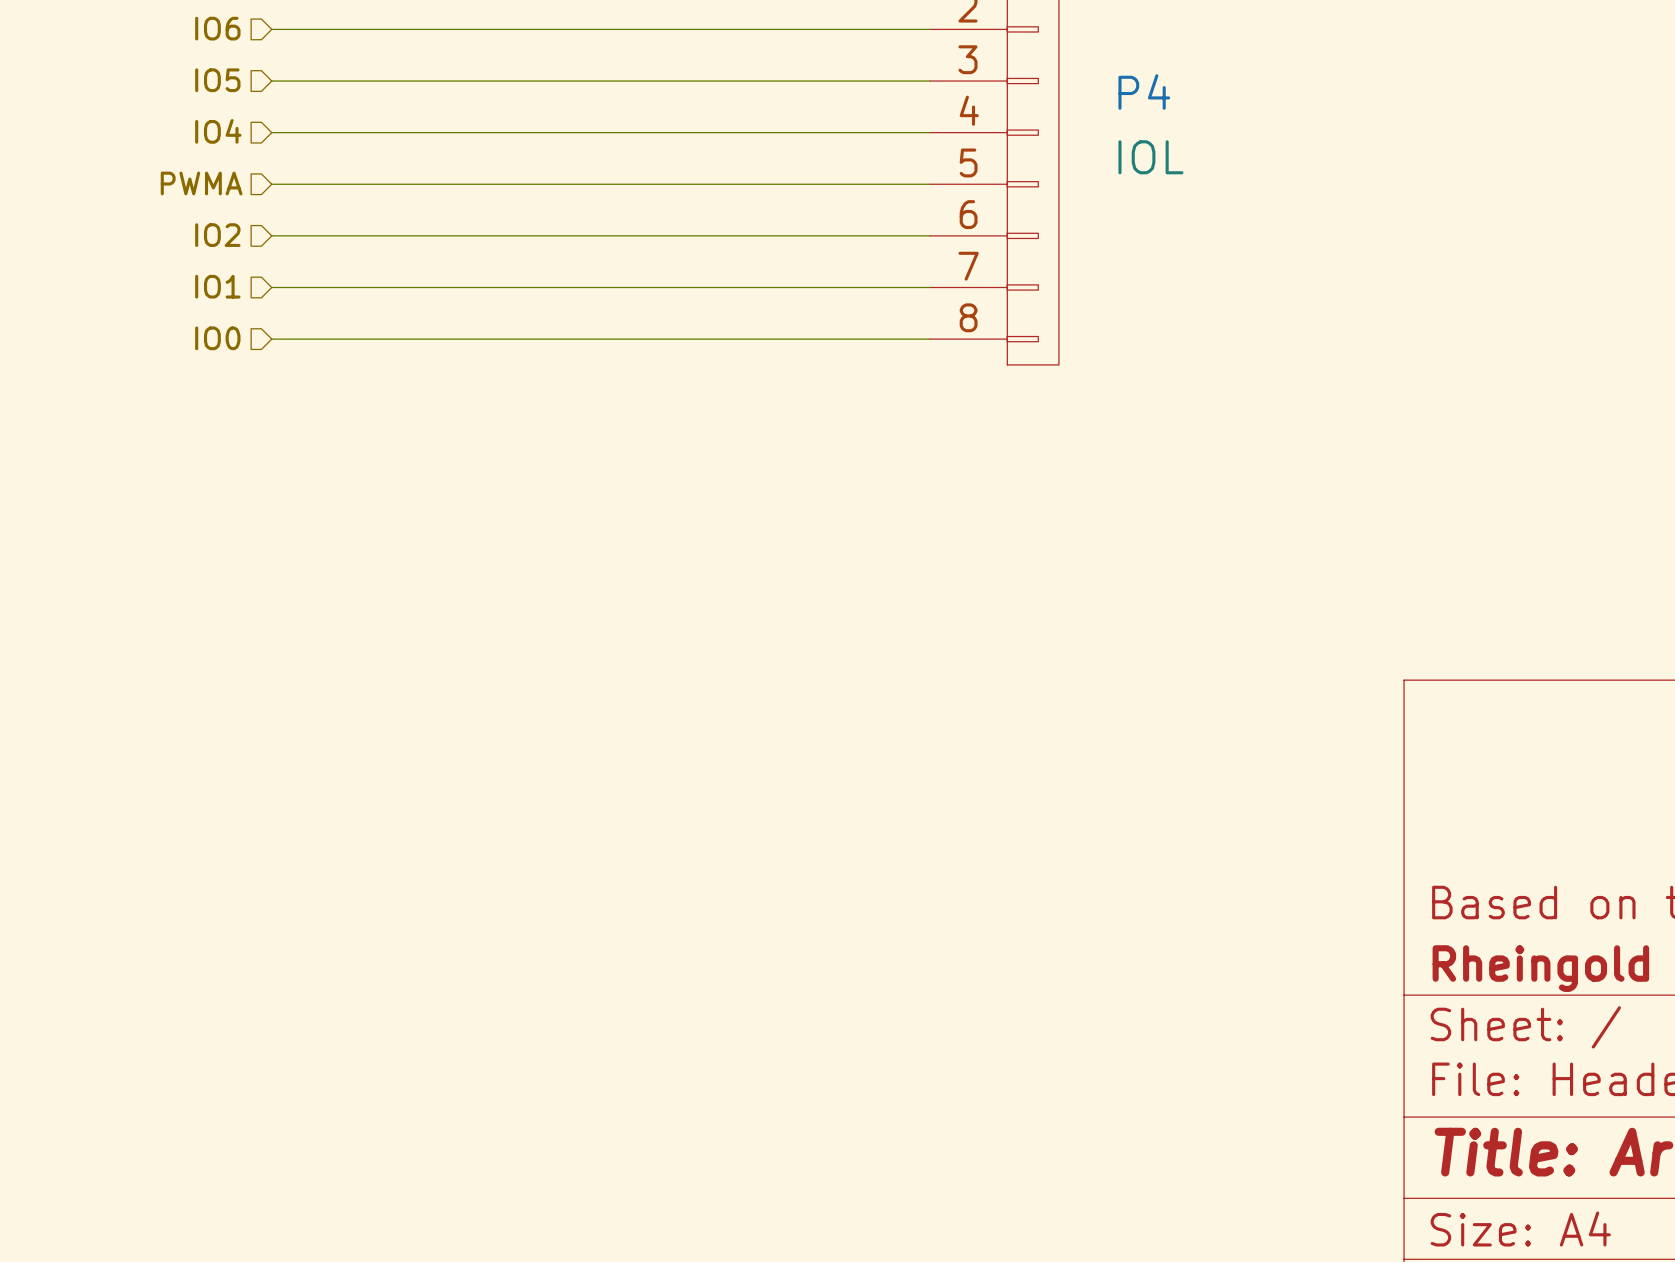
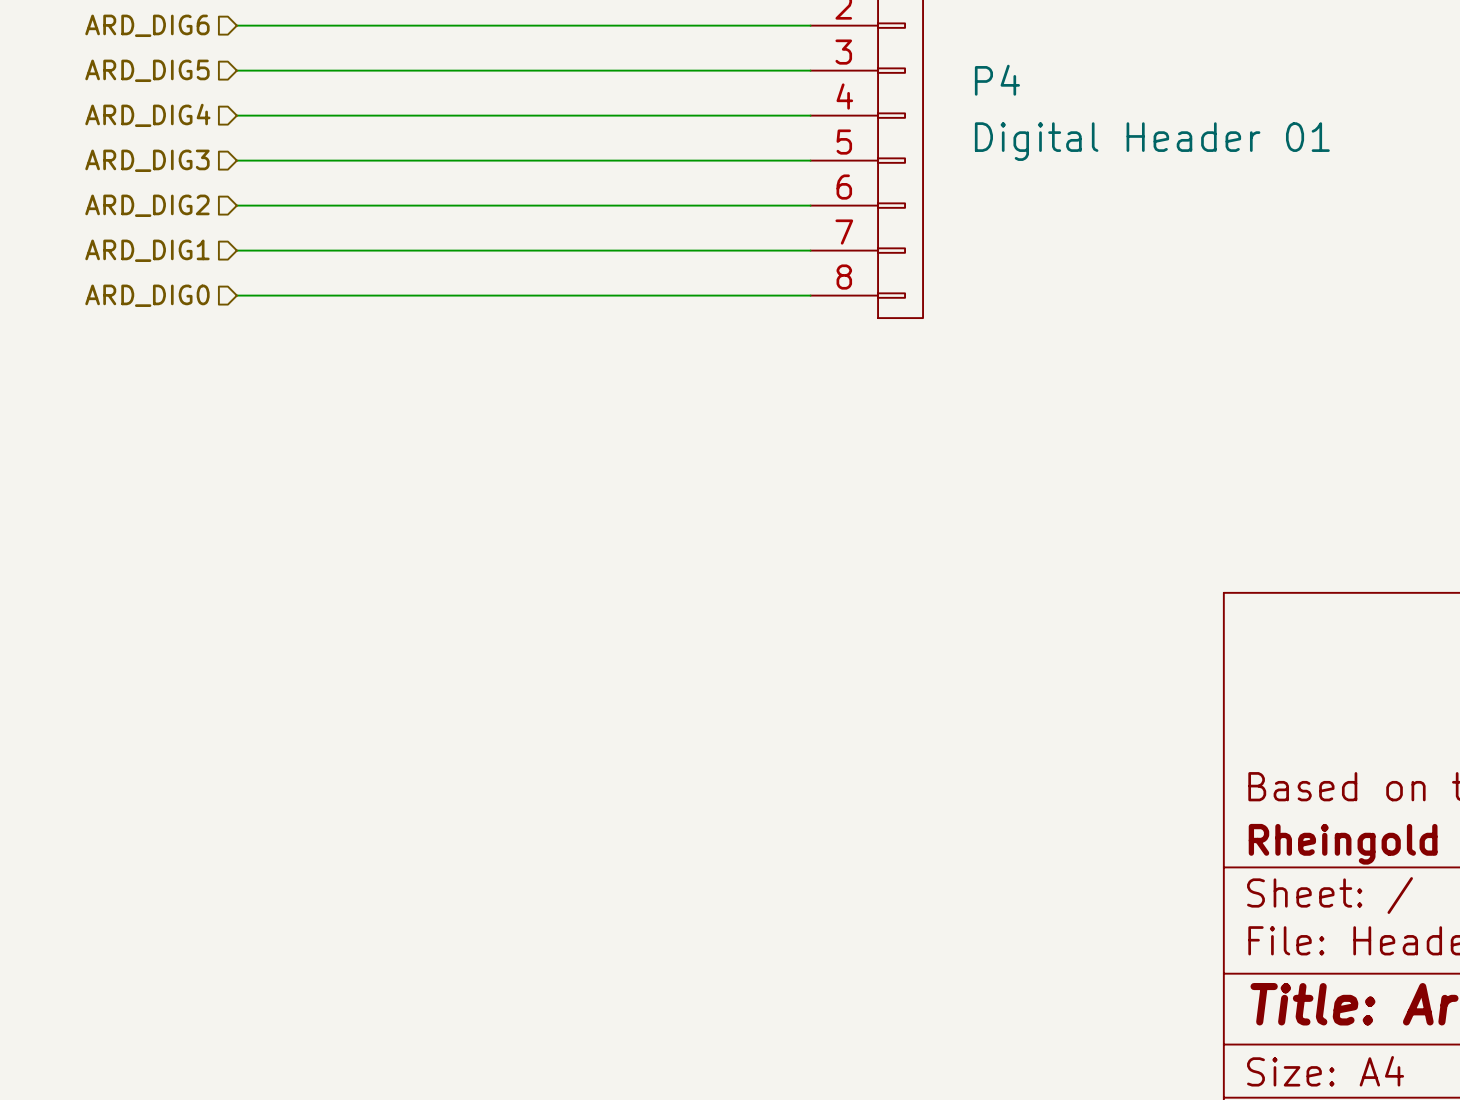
hierarchical label: IO6 (217, 28) -> ARD_DIG6 (147, 25)
hierarchical label: IO5 (217, 80) -> ARD_DIG5 (147, 70)
hierarchical label: IO4 (218, 131) -> ARD_DIG4 (147, 115)
P4 value: IOL (1150, 157) -> Digital Header 01 (1152, 141)
hierarchical label: PWMA (201, 183) -> ARD_DIG3 (147, 160)
hierarchical label: IO2 (217, 235) -> ARD_DIG2 (147, 205)
hierarchical label: IO1 (217, 286) -> ARD_DIG1 (147, 250)
hierarchical label: IO0 (217, 338) -> ARD_DIG0 (147, 295)

